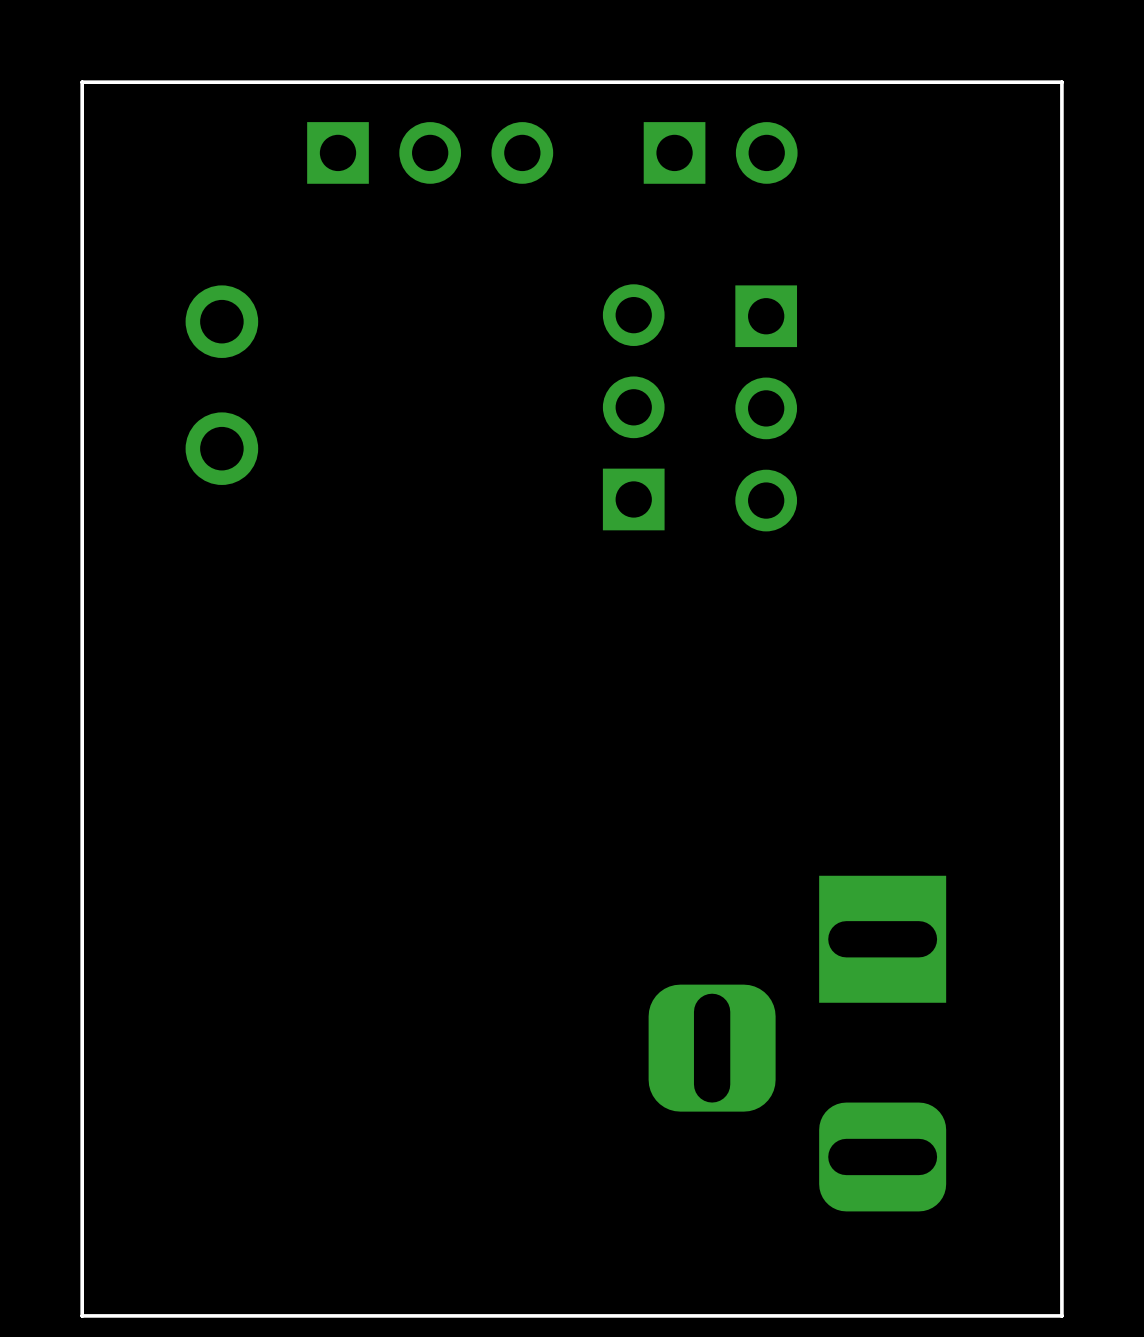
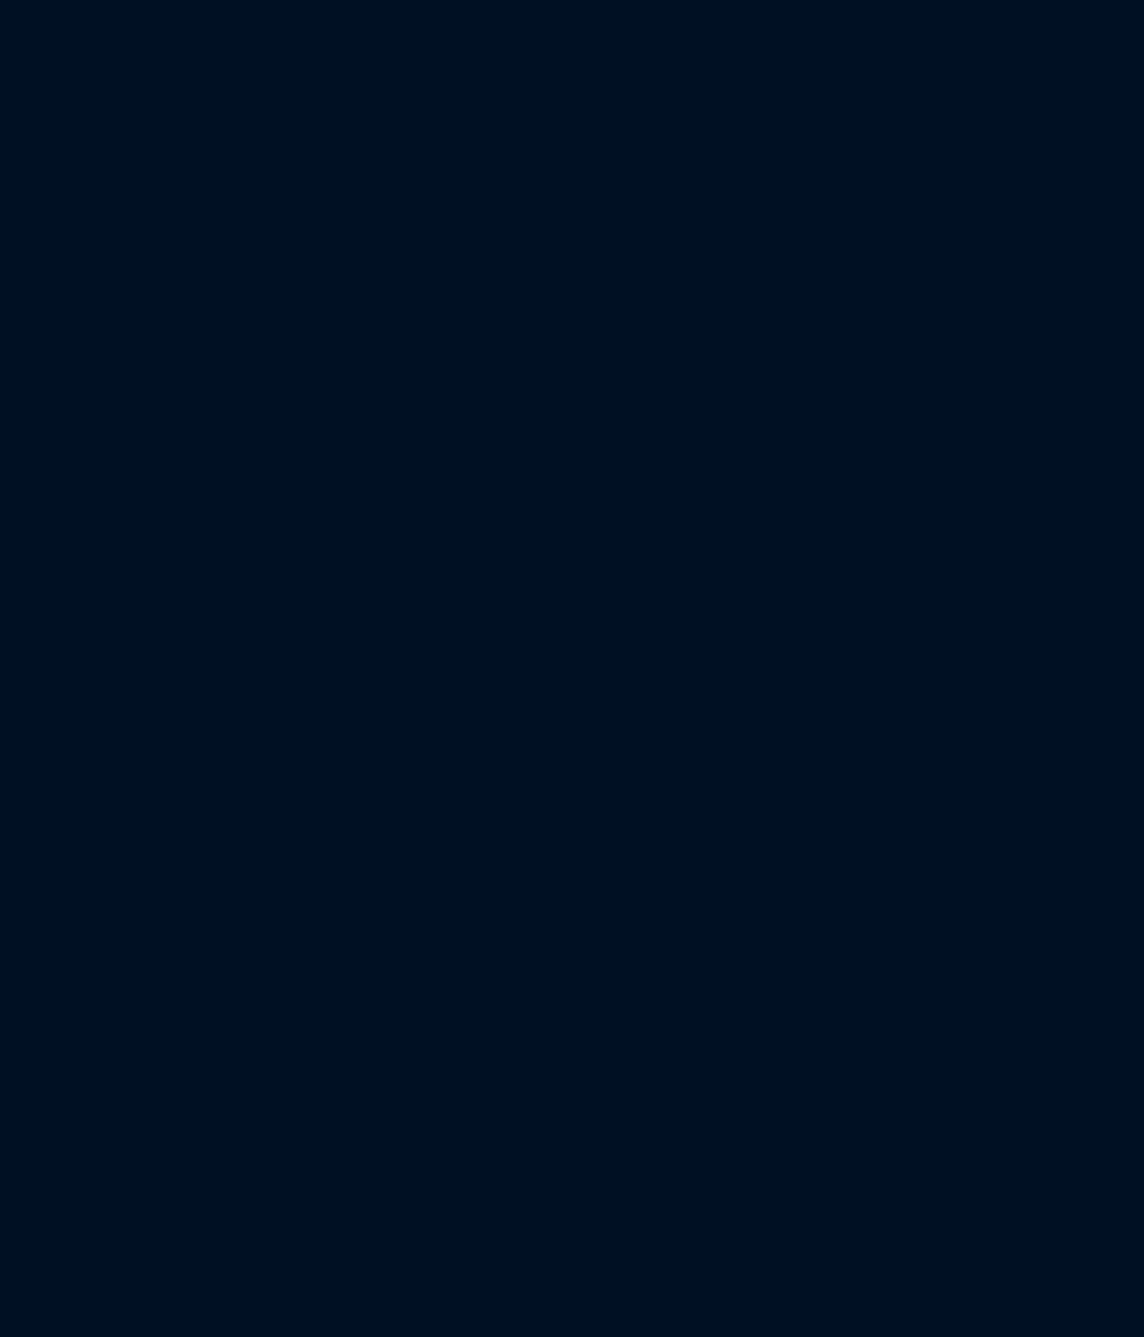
board edge: (1061, 82) (1061, 1315) (82, 1315) (82, 82) (1061, 82) -> none
part: (430, 152) -> none
part: (720, 152) -> none
part: (221, 385) -> none
part: (633, 407) -> none
part: (766, 408) -> none
part: (797, 1043) -> none

